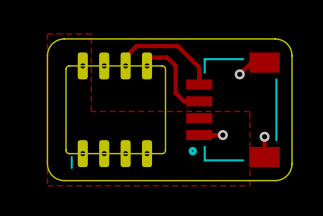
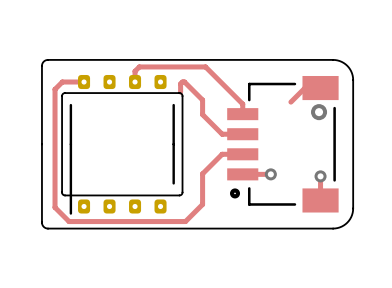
zone outline: (47, 33) (91, 33) (91, 111) (249, 111) (249, 185) (47, 185) (47, 33) -> none
board edge: (64, 38) (56, 40) (50, 46) (47, 53) (47, 69) -> (82, 59) (47, 59) (41, 65) (42, 224) (47, 228) (82, 228)
track: none -> (84, 82) (62, 82) (55, 89) (55, 207) (69, 221) (185, 221) (202, 204) (202, 173) (222, 154) (242, 154)
track: (150, 57) (167, 57) (175, 65) (175, 92) (184, 101) -> (184, 82) (202, 100) (202, 114) (222, 134) (224, 134)
track: (125, 65) (125, 56) (136, 46) (177, 46) (199, 67) (199, 76) -> (135, 82) (135, 71) (139, 66) (205, 66) (242, 104)
via: (239, 74) -> none
via: none -> (319, 112)
part: none -> (122, 144)
part: (115, 110) -> none
board edge: (47, 150) (47, 165) (50, 172) (55, 178) (64, 180) -> (62, 192) (65, 195) (181, 194) (182, 96) (179, 93) (65, 93) (62, 96)

